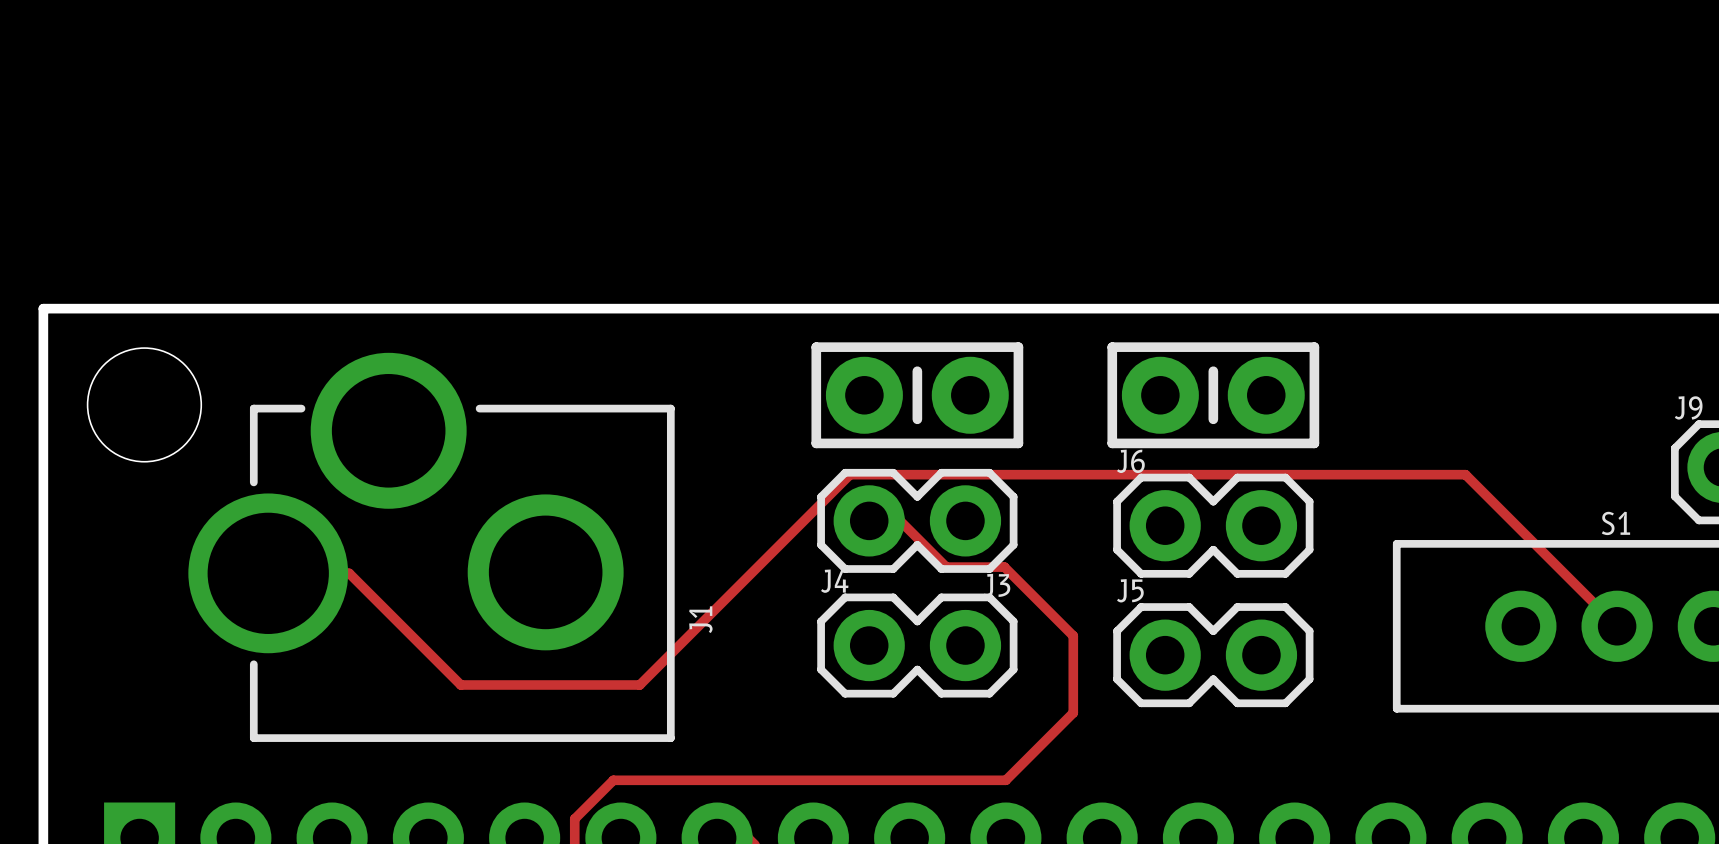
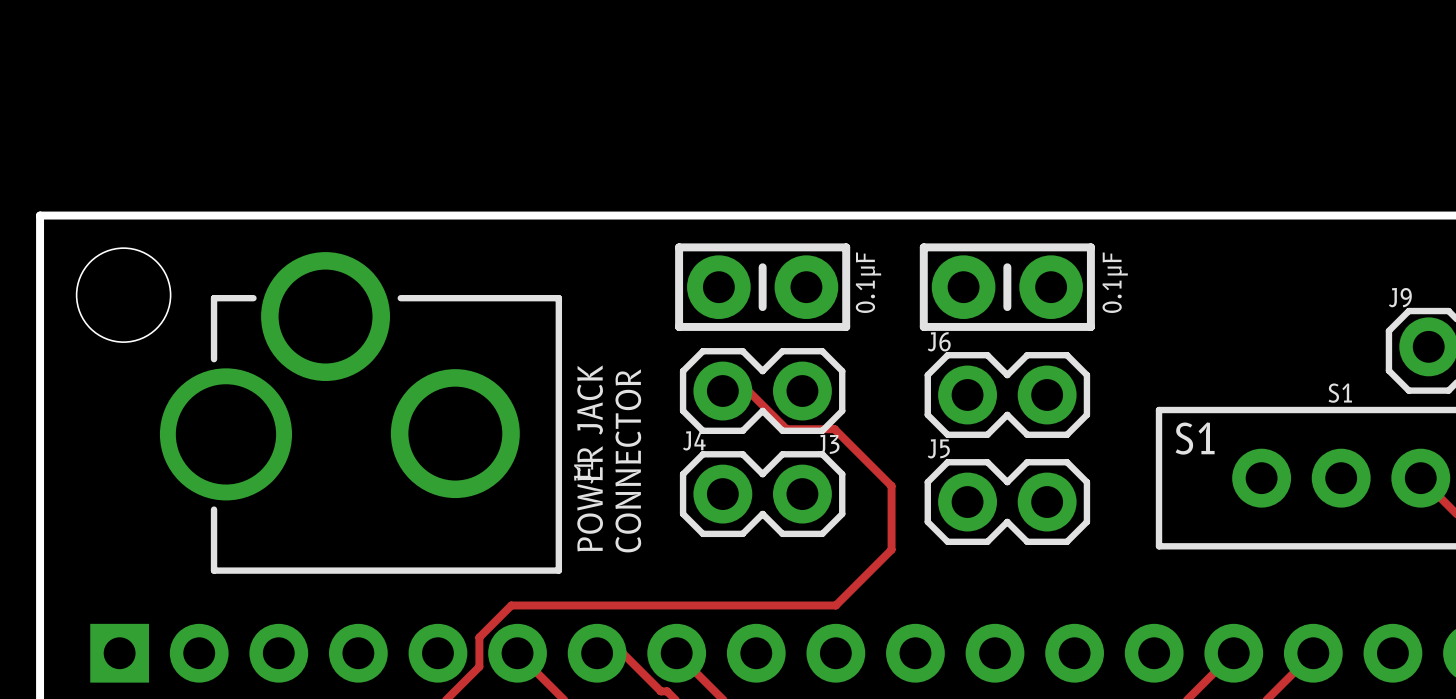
text: none -> 0.1μF (868, 282)
text: none -> 0.1μF (1115, 282)
track: (268, 573) (349, 573) (460, 685) (639, 685) (850, 474) (1465, 474) (1617, 626) -> none
text: none -> S1 (1195, 438)
text: none -> POWER JACK (590, 458)
text: none -> CONNECTOR (628, 460)

